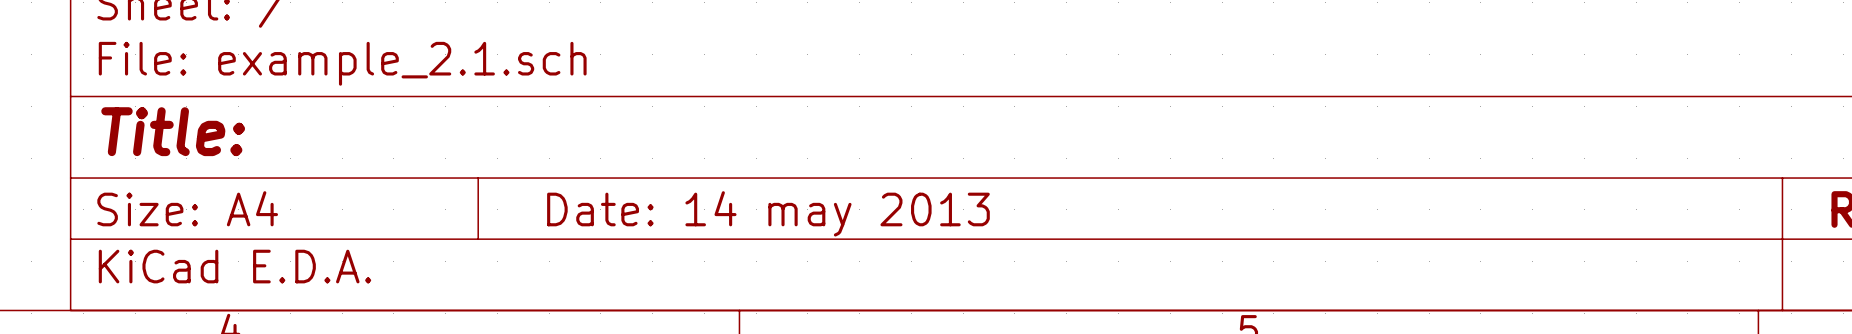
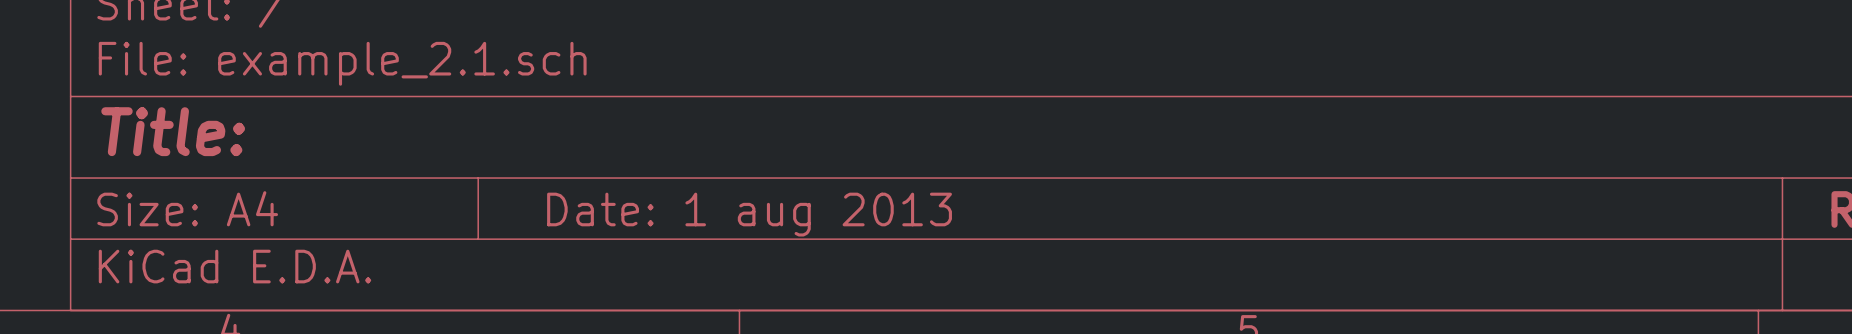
title block: Date: 14 may 2013 (768, 213) -> Date: 1 aug 2013 (749, 214)

